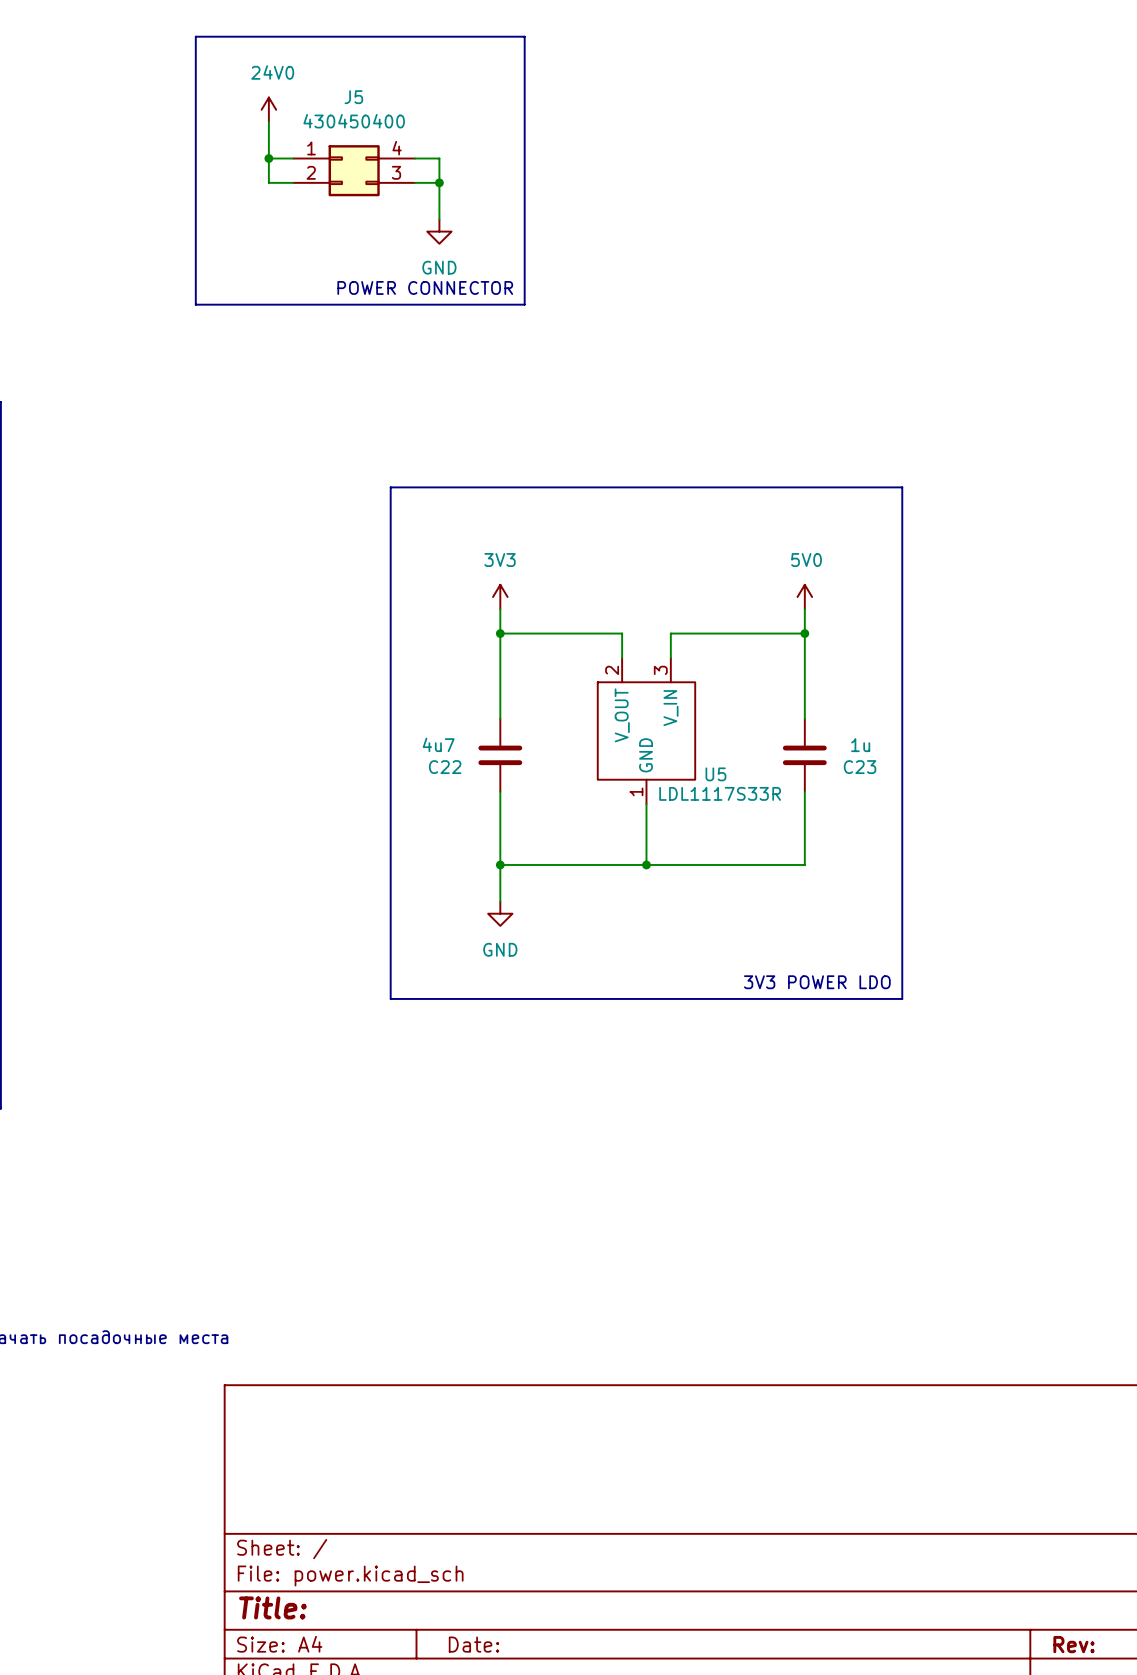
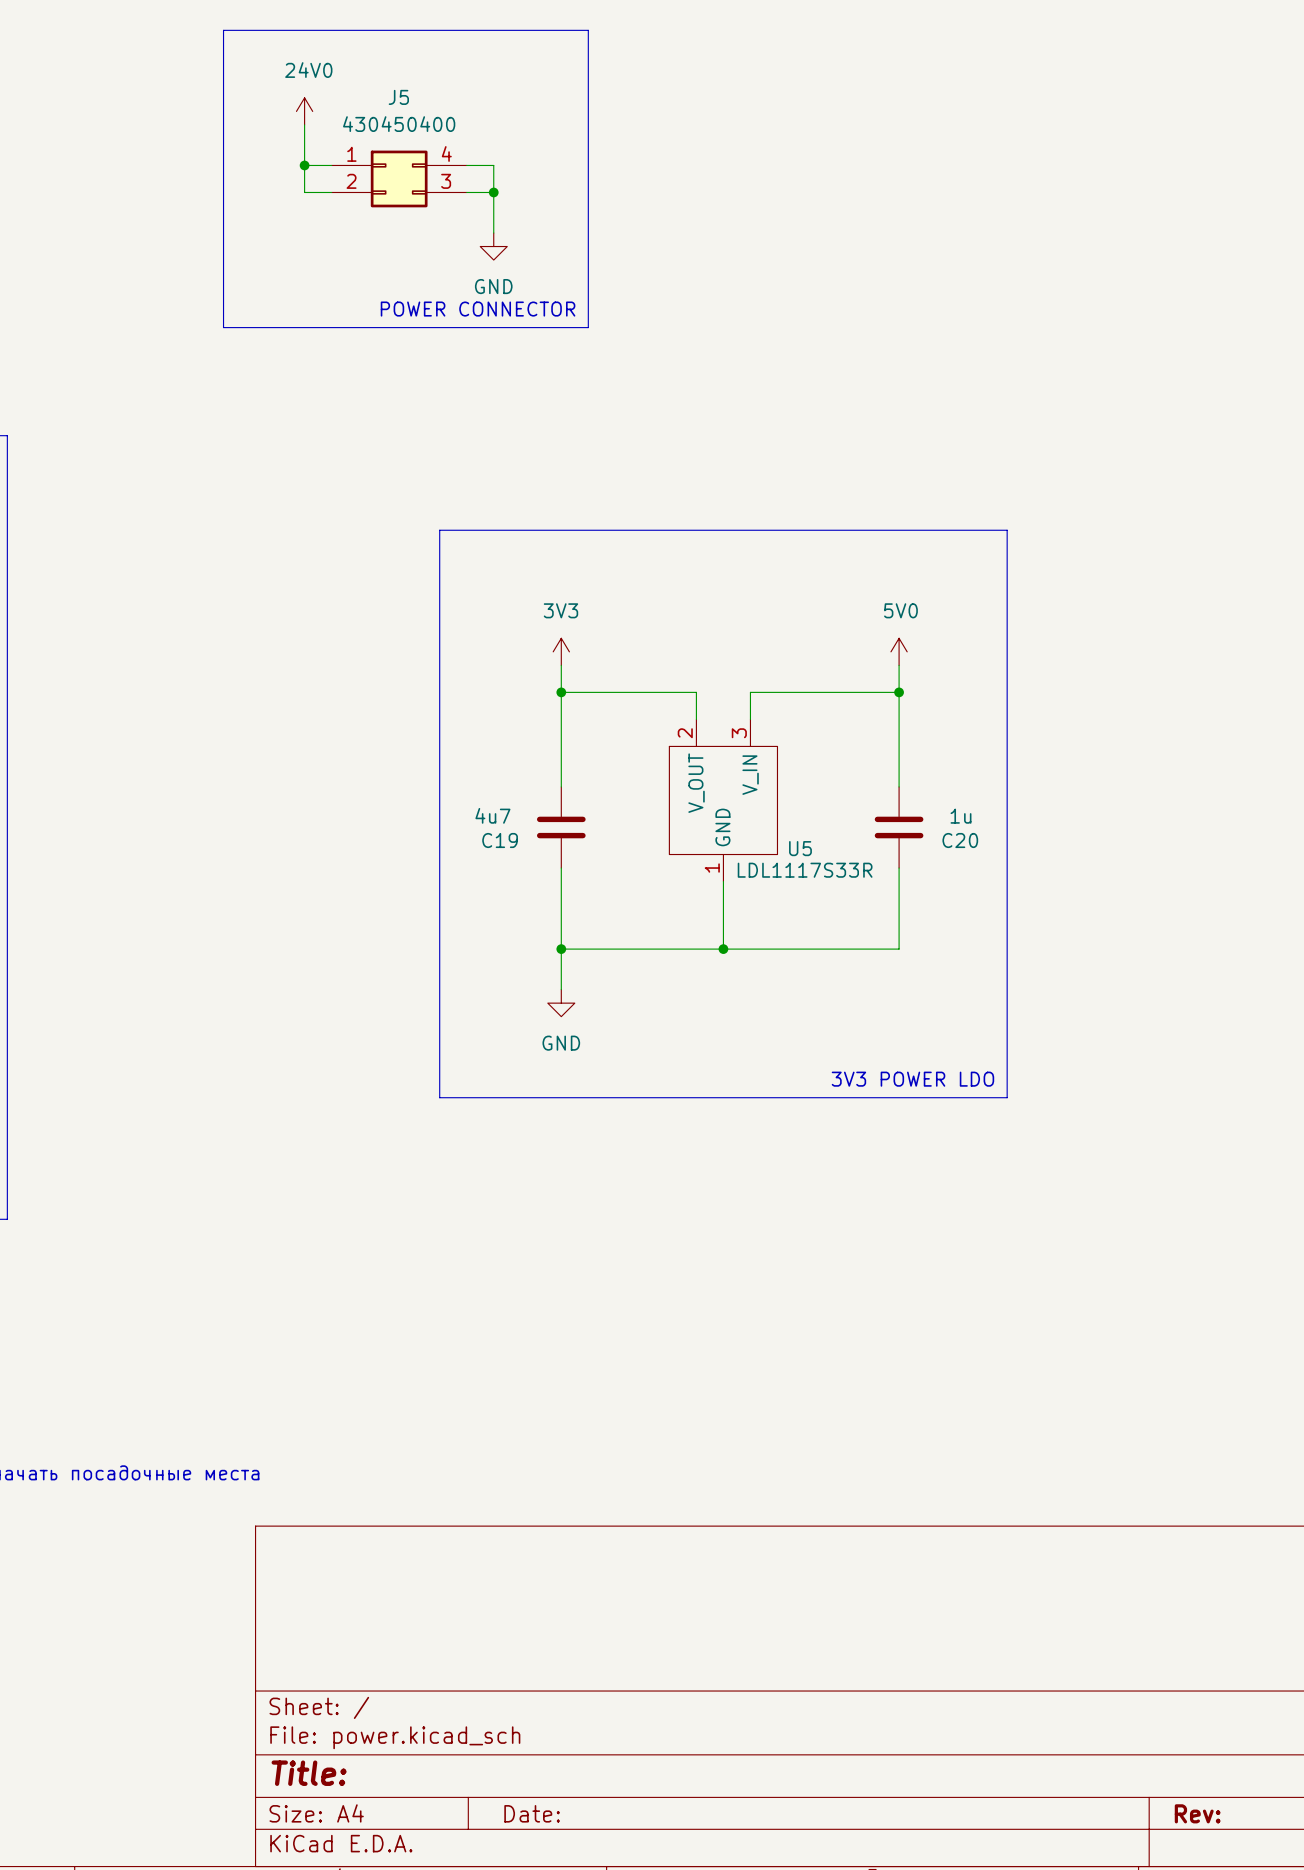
C22 name: C22 (445, 767) -> C19 (500, 840)
C23 name: C23 (860, 767) -> C20 (960, 840)

